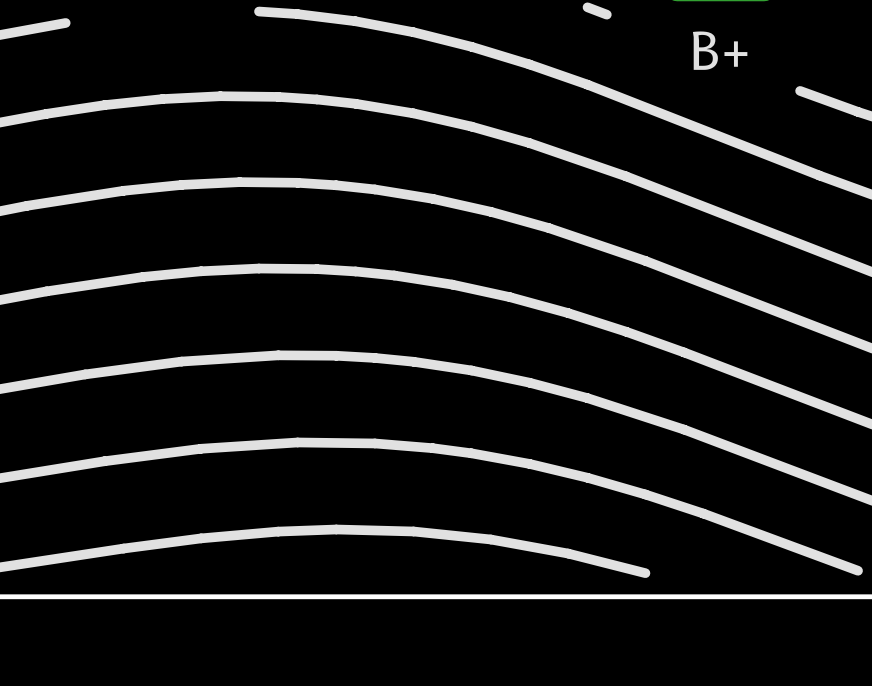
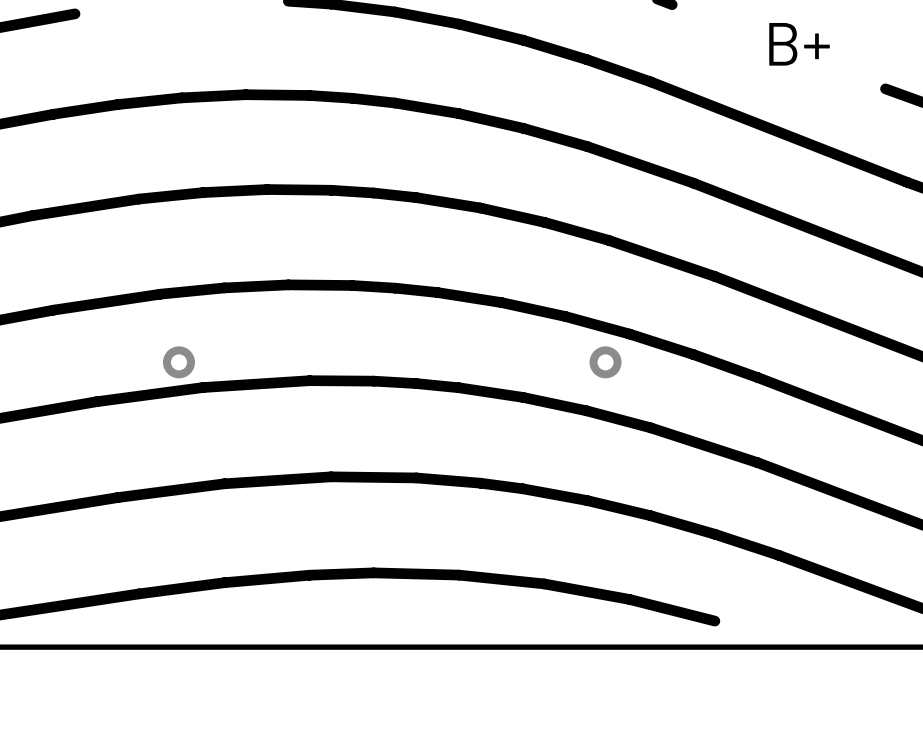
via: none -> (178, 362)
via: none -> (605, 362)

